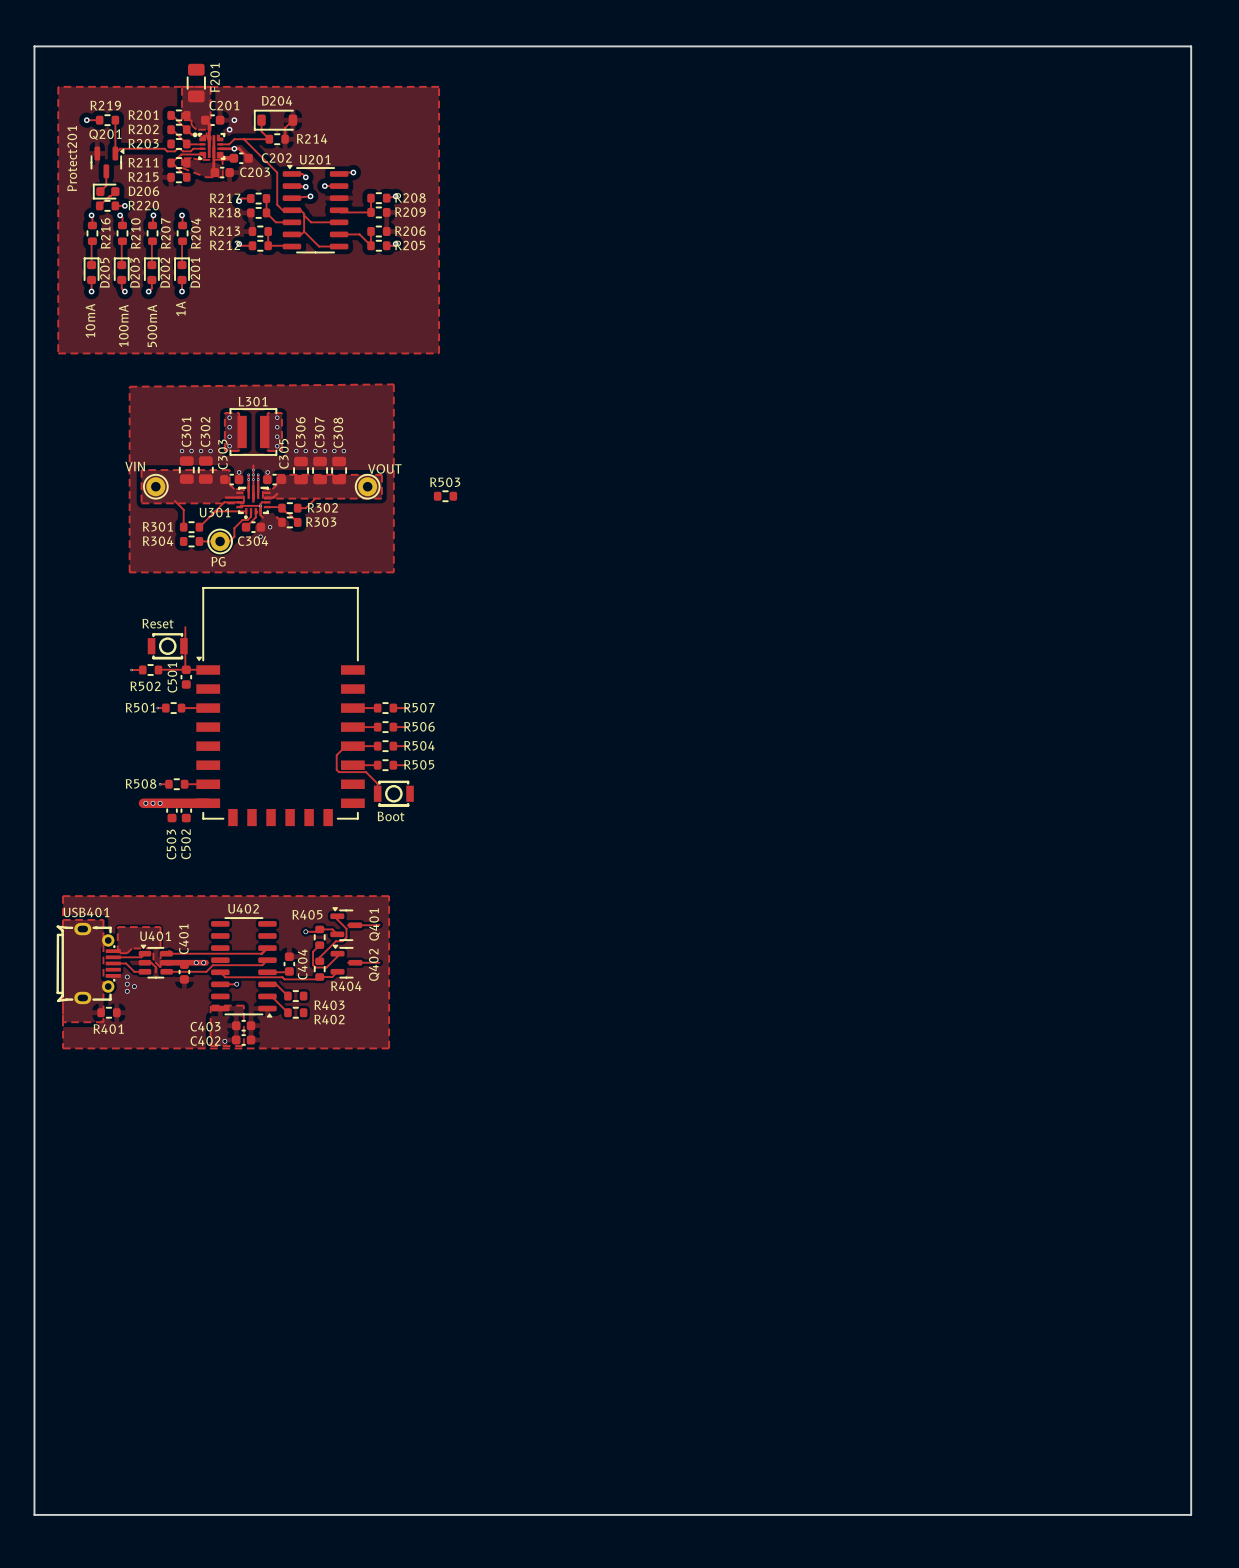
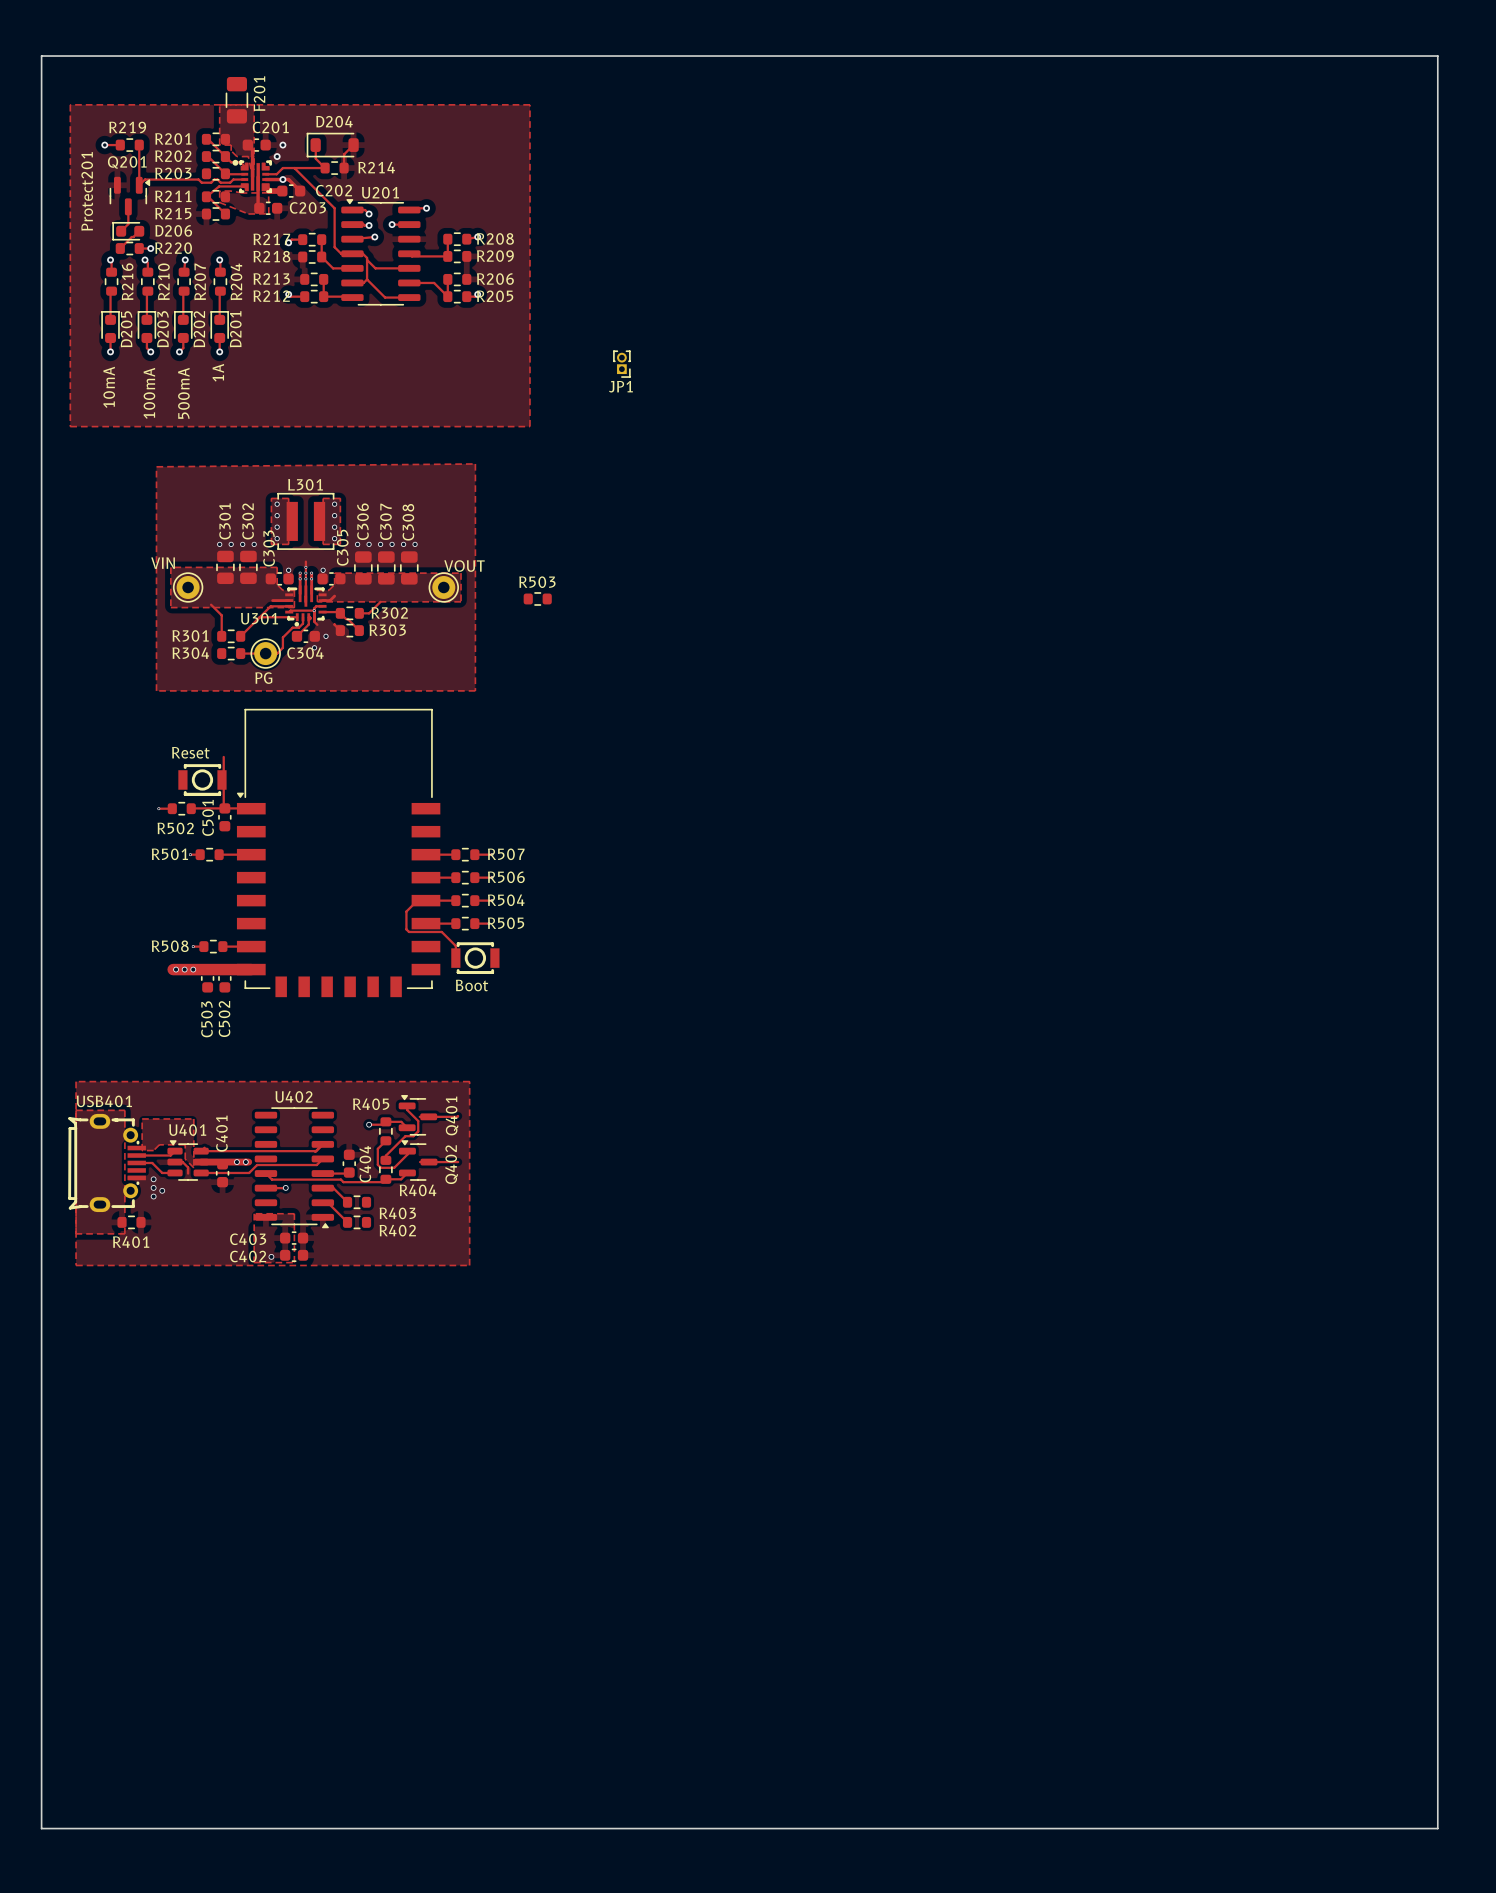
JP1: none -> (621, 364)

